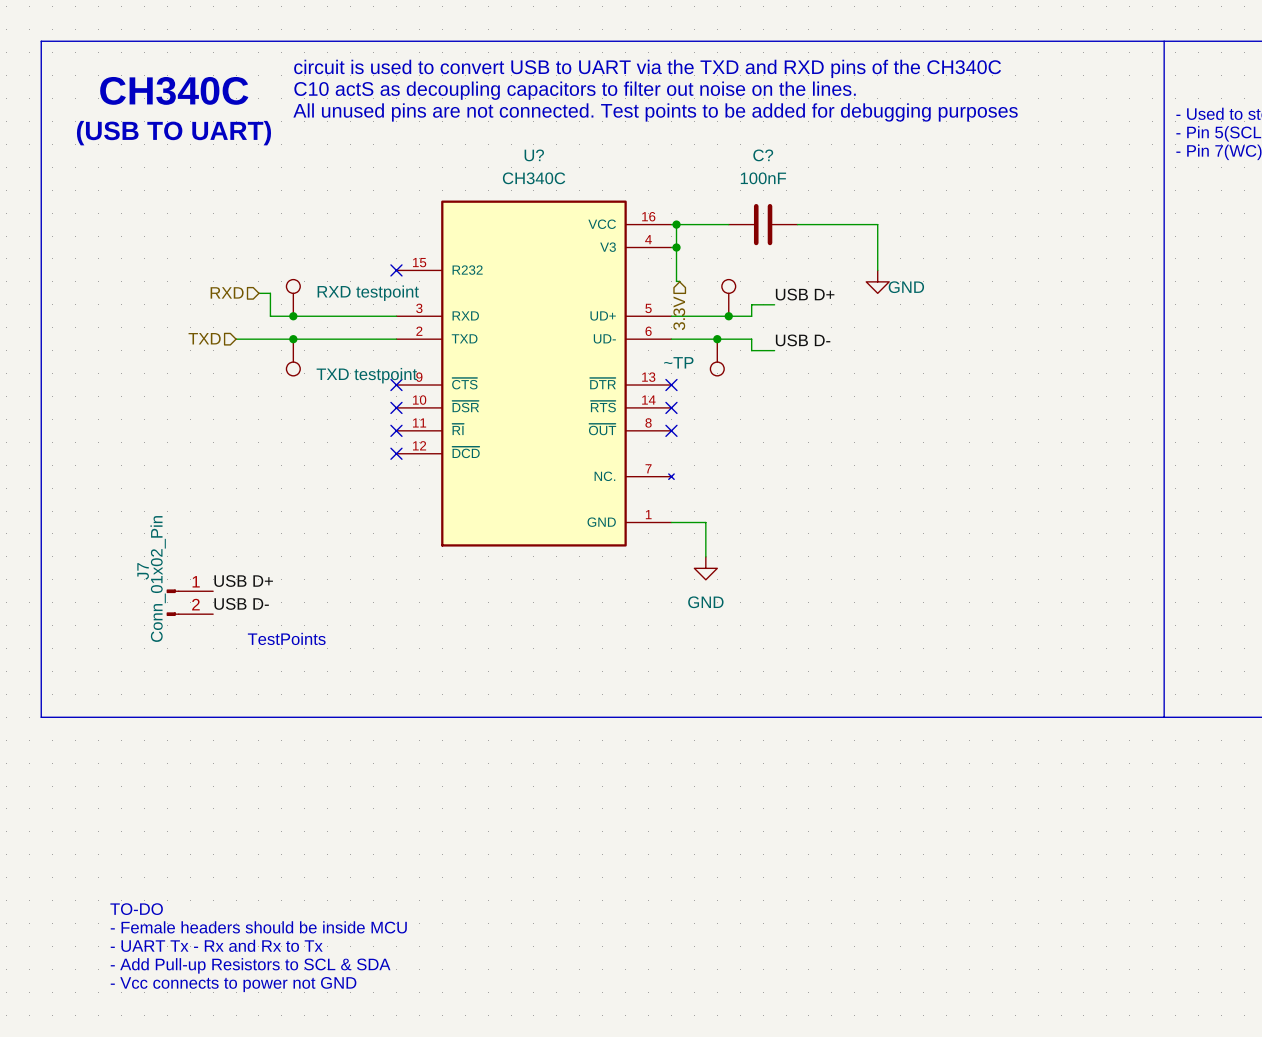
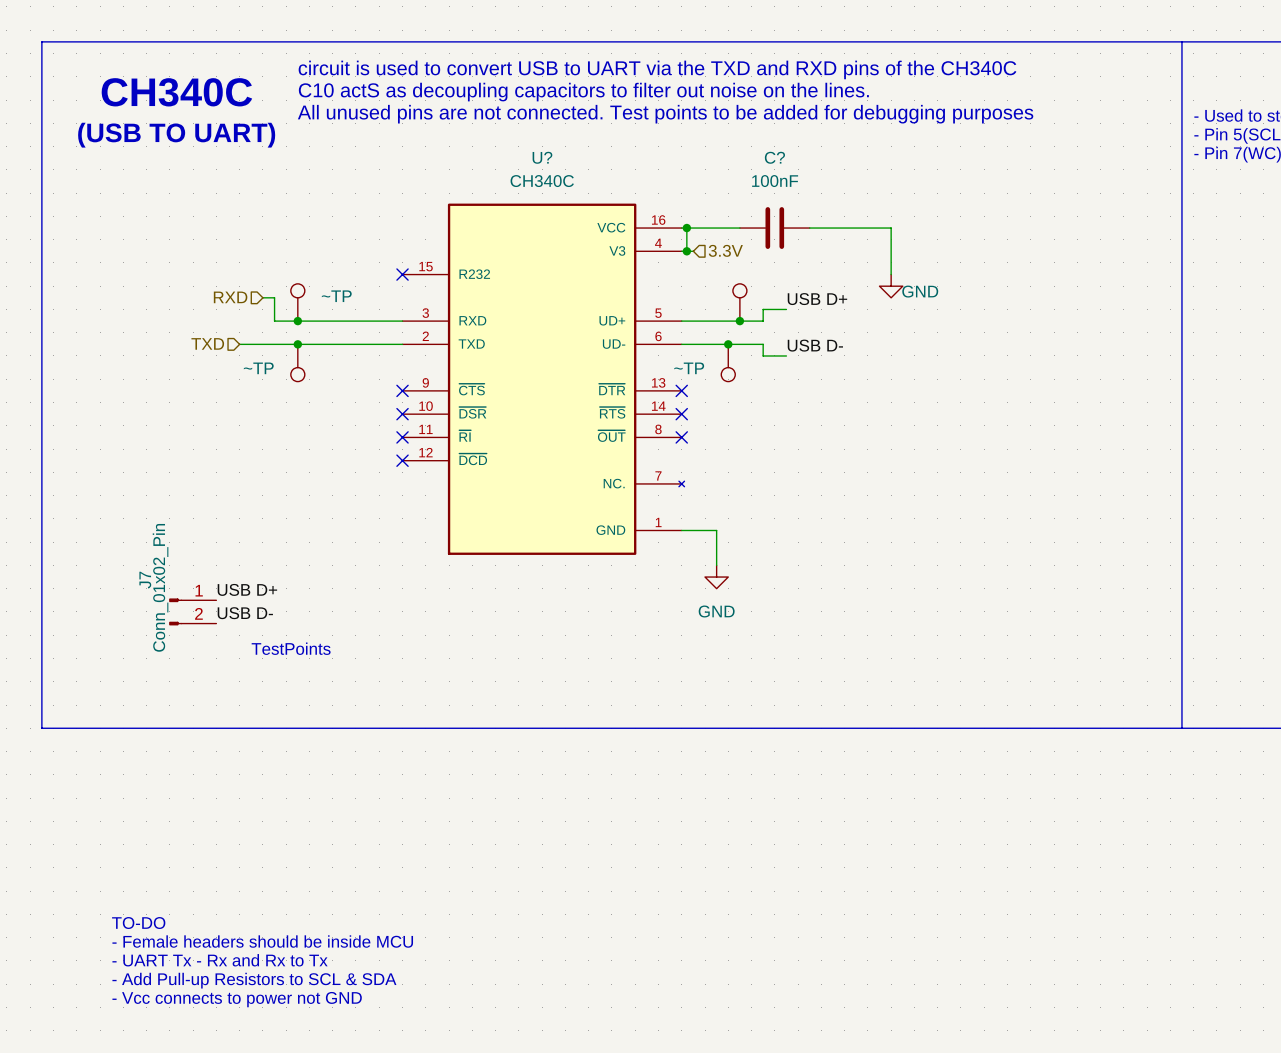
wire: (676, 247) (676, 281) (679, 281) -> none
part value: RXD testpoint (368, 293) -> ~TP (336, 296)
hierarchical label rotation: 0° (679, 313) -> 90° counterclockwise (725, 250)
hierarchical label position: 3.3V (679, 313) -> 3.3V (725, 250)
part value: TXD testpoint (366, 375) -> ~TP (258, 368)

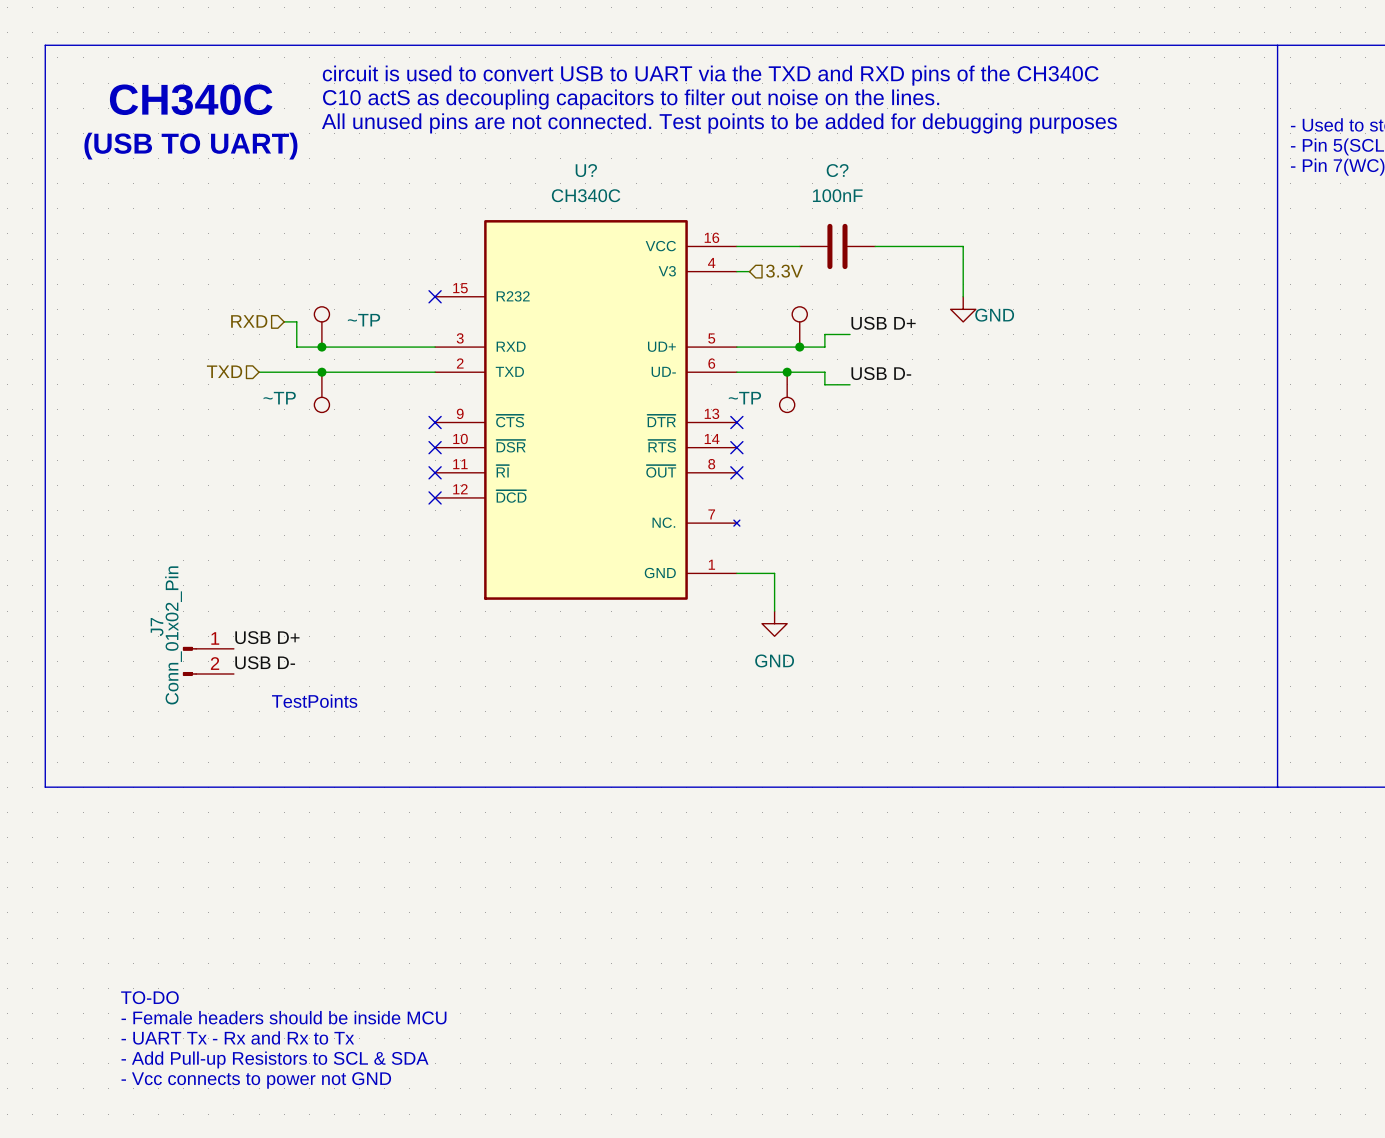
wire: (686, 228) (686, 251) -> none
junction: (686, 228) -> none
junction: (686, 251) -> none

